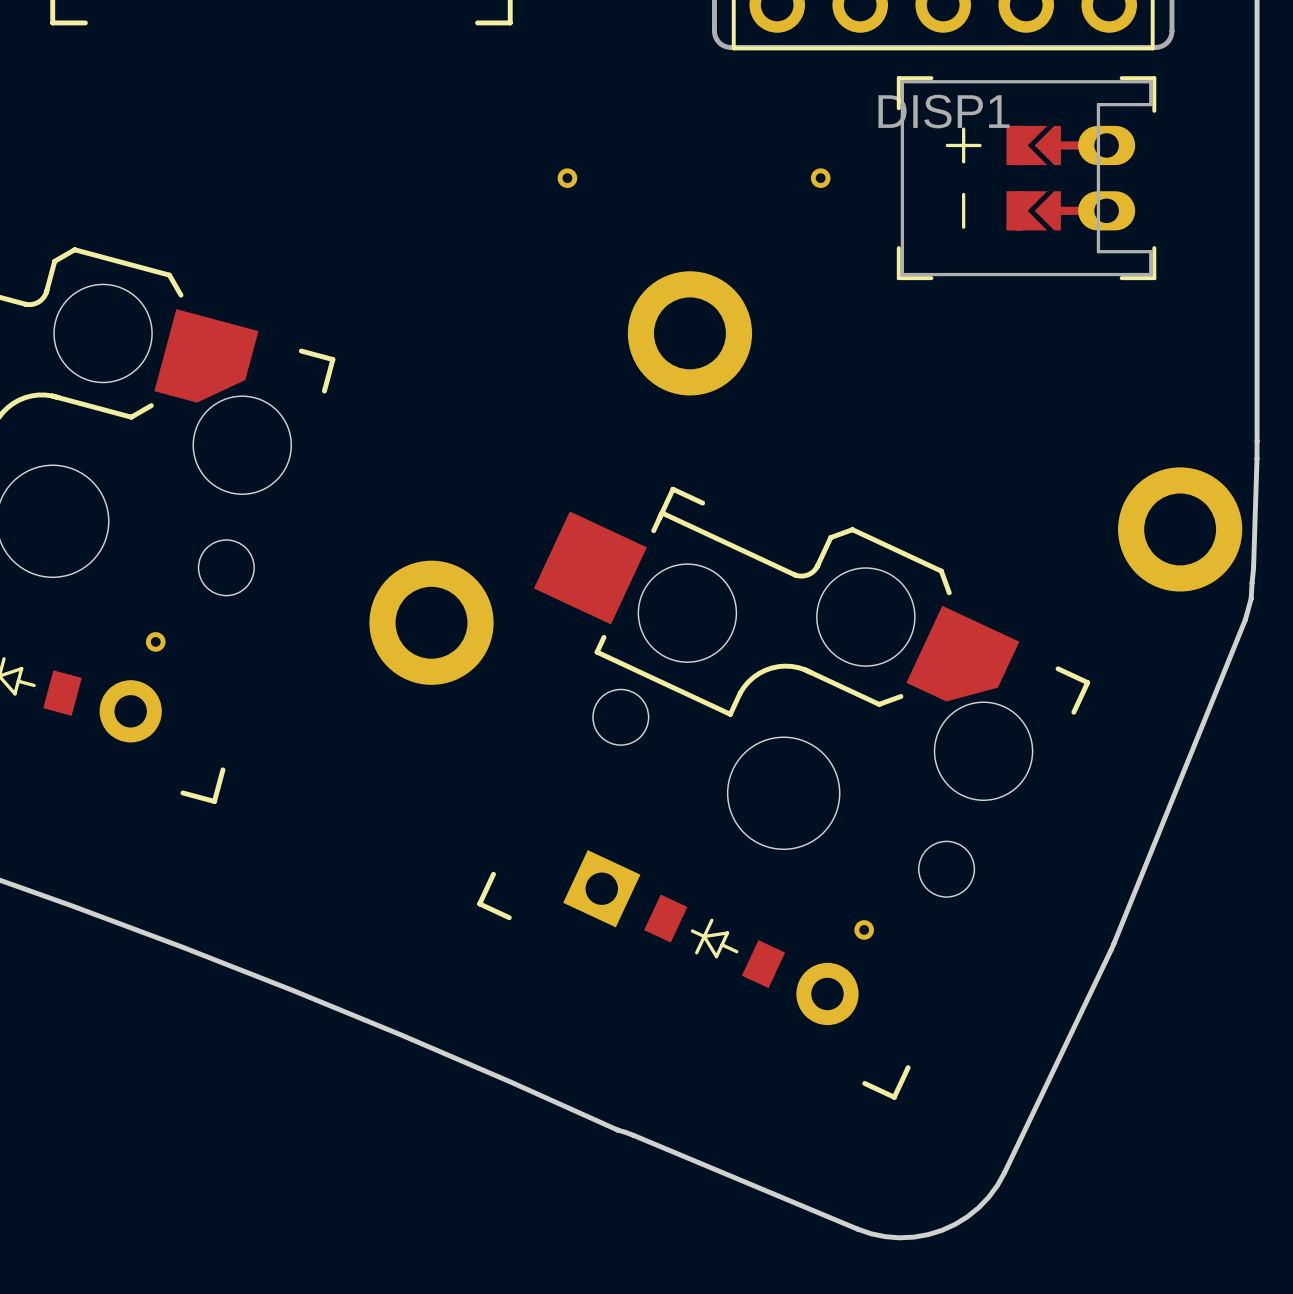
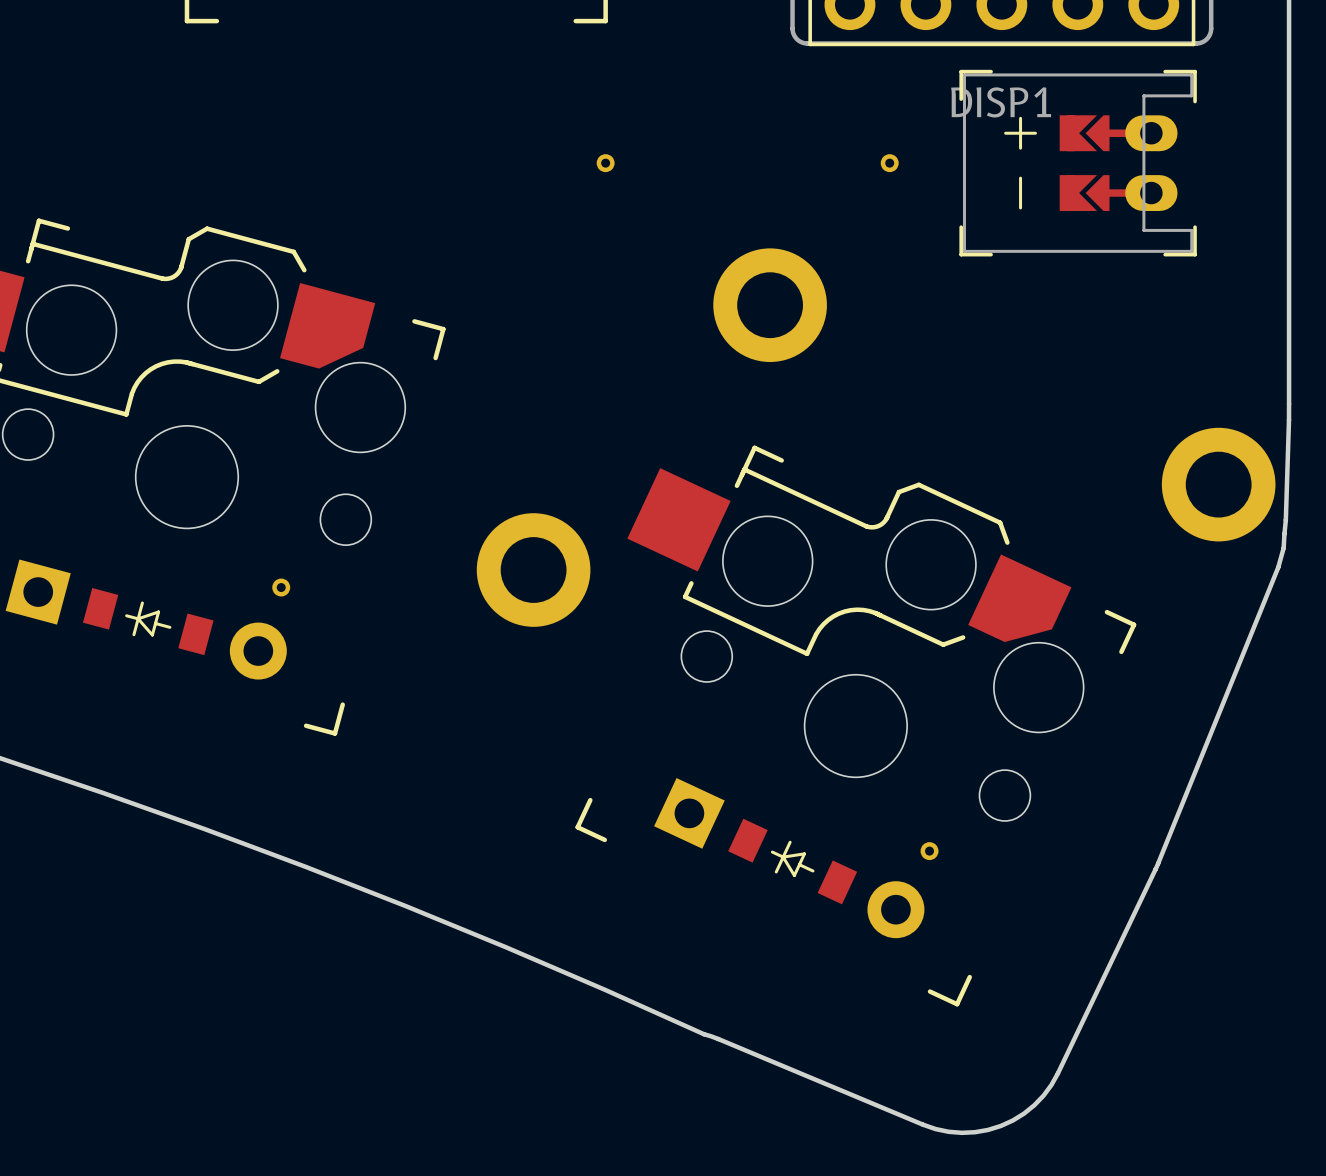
part position: (567, 178) -> (605, 163)

